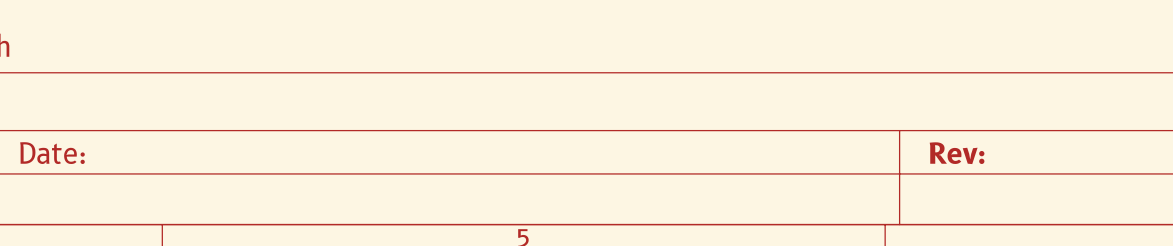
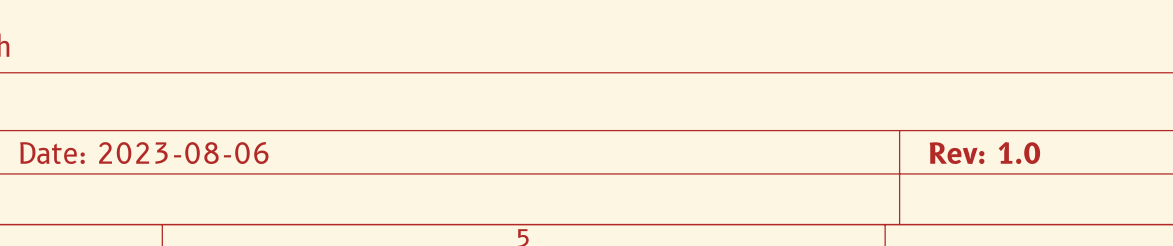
title block: Date: (52, 153) -> Date: 2023-08-06 (144, 153)
title block: Rev: (957, 153) -> Rev: 1.0 (984, 153)

